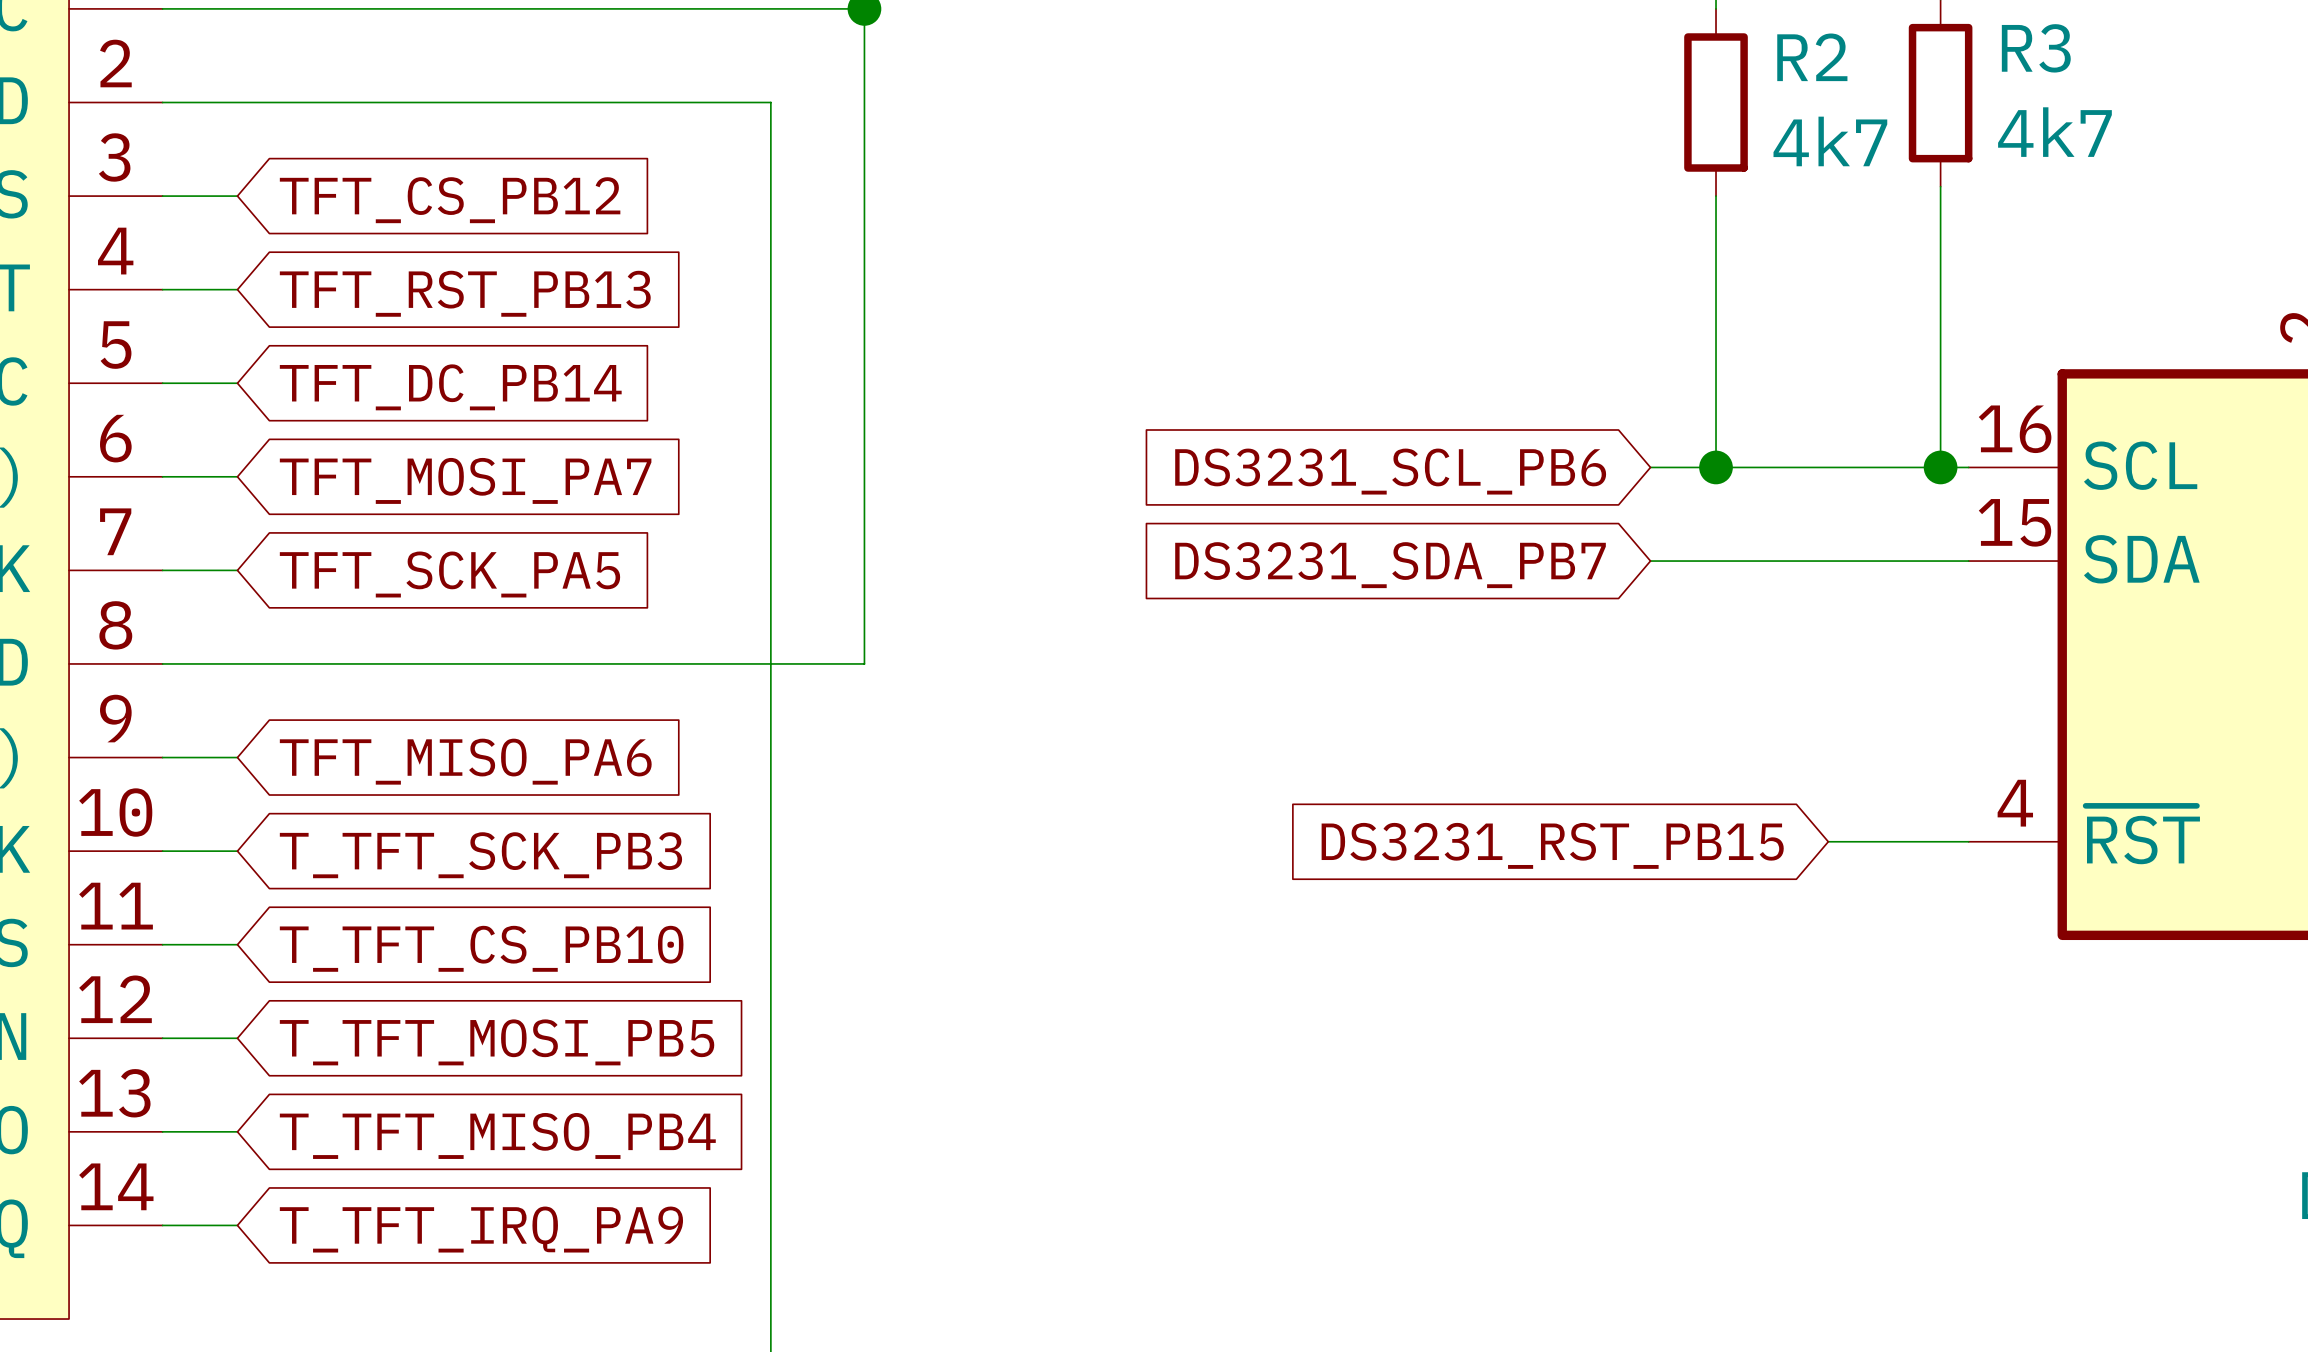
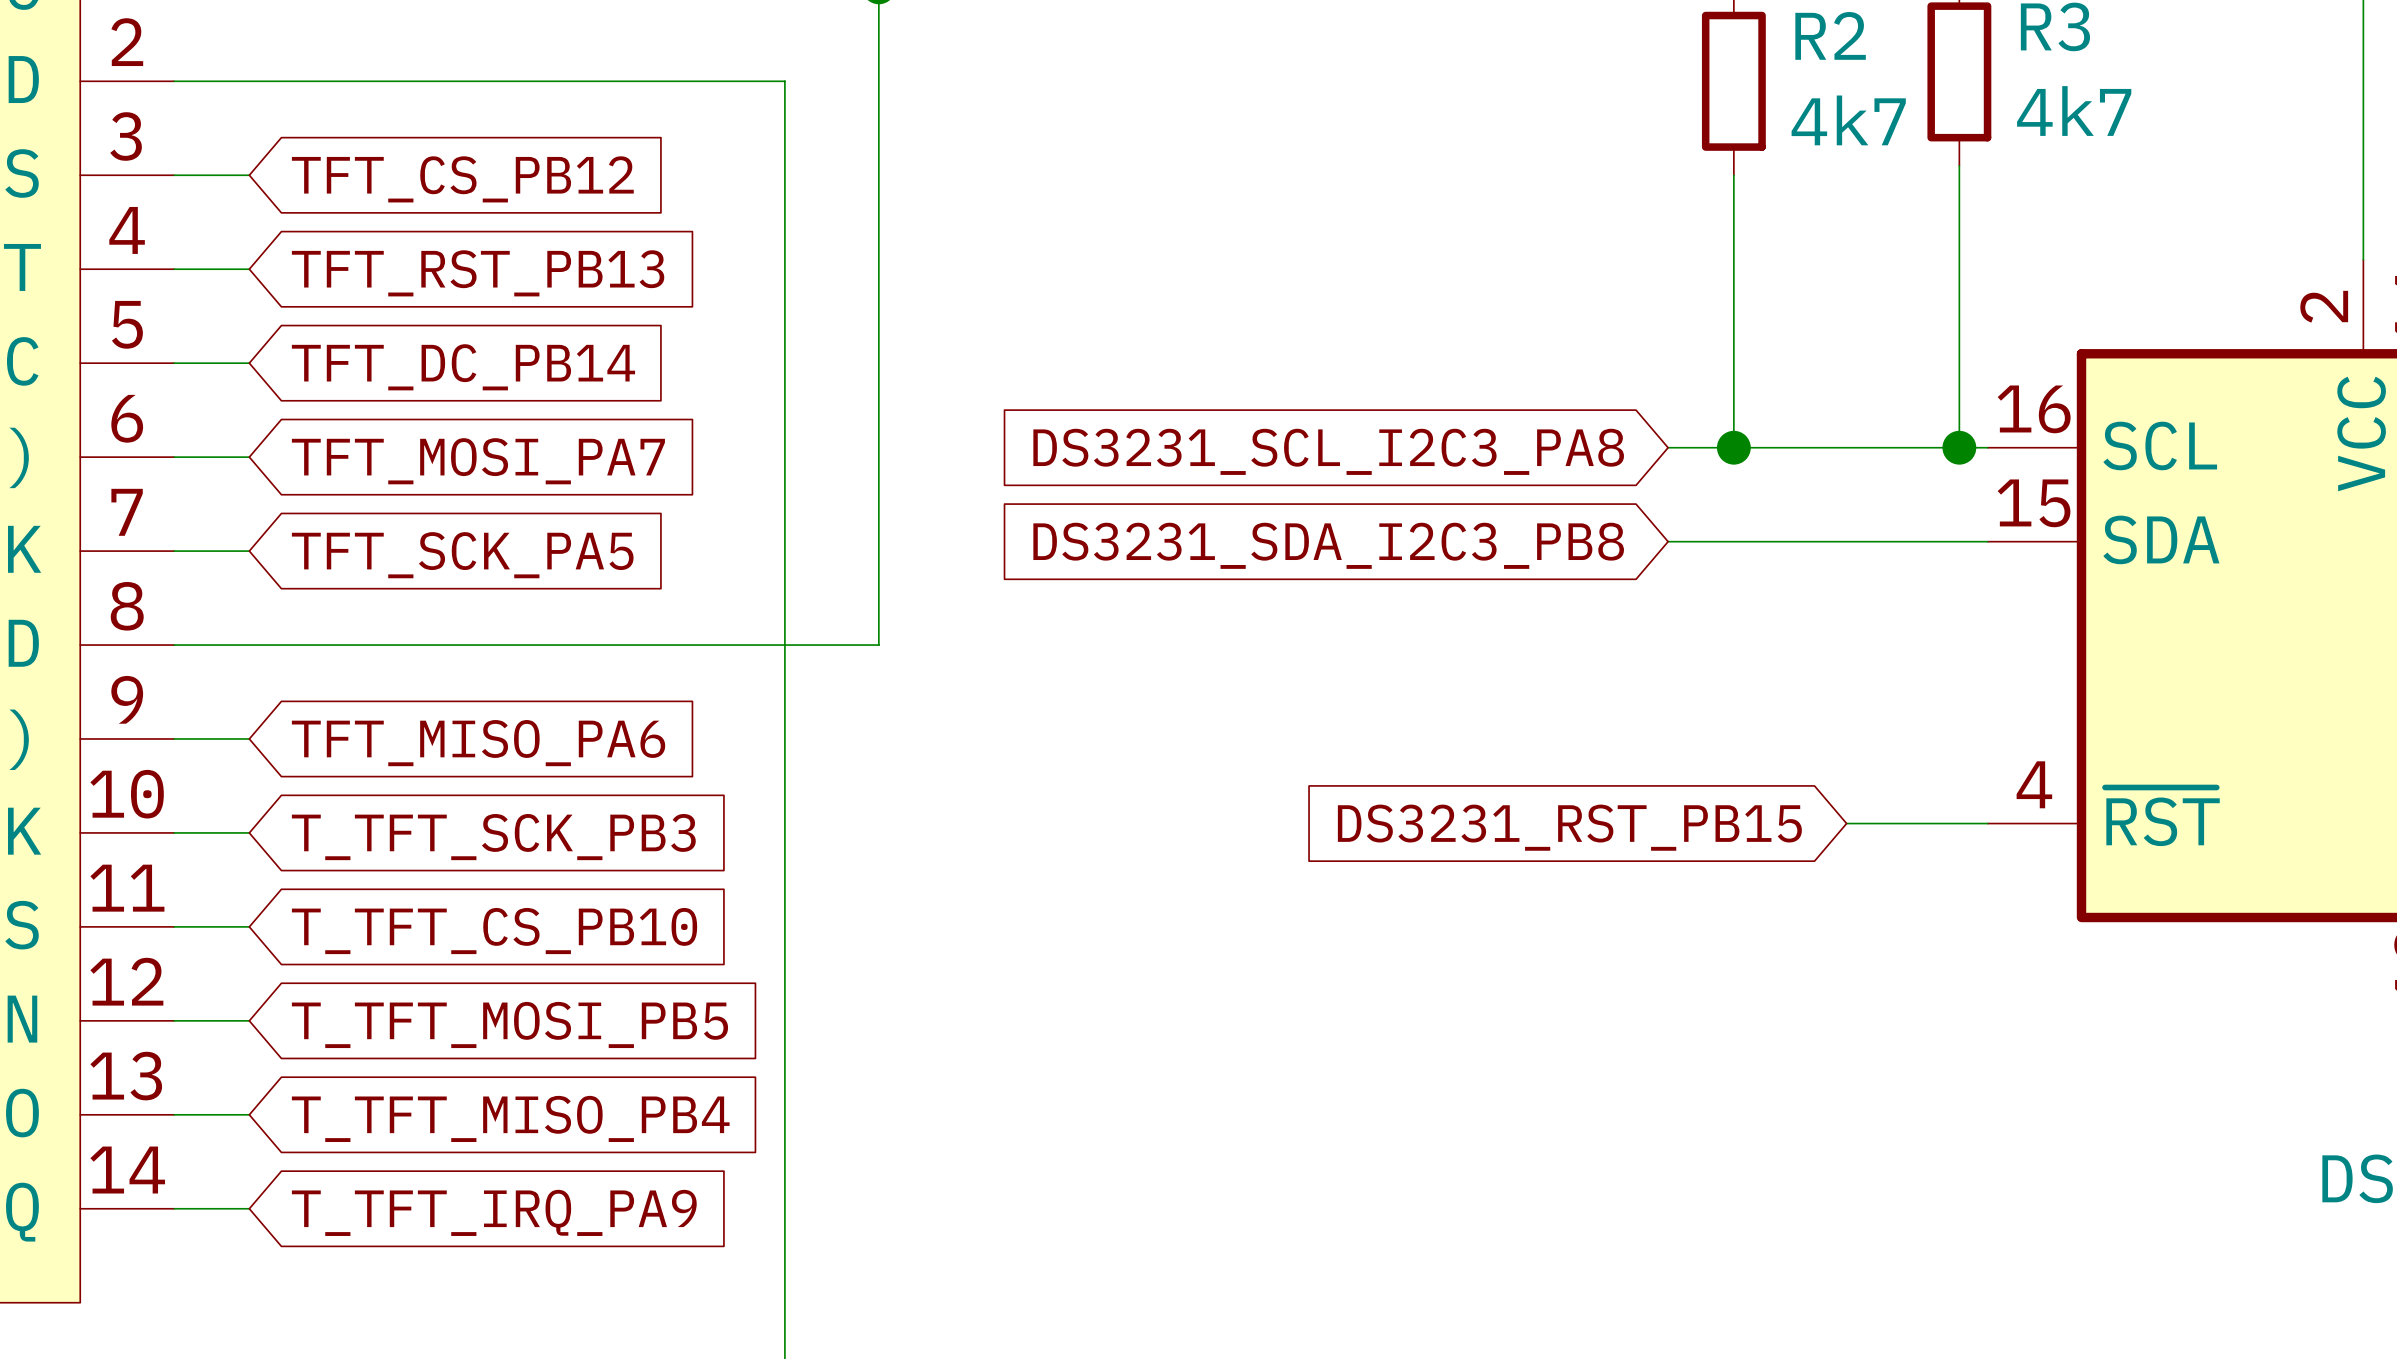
global label: DS3231_SCL_PB6 (1390, 471) -> DS3231_SCL_I2C3_PA8 (1328, 451)
global label: DS3231_SDA_PB7 (1390, 565) -> DS3231_SDA_I2C3_PB8 (1328, 545)

